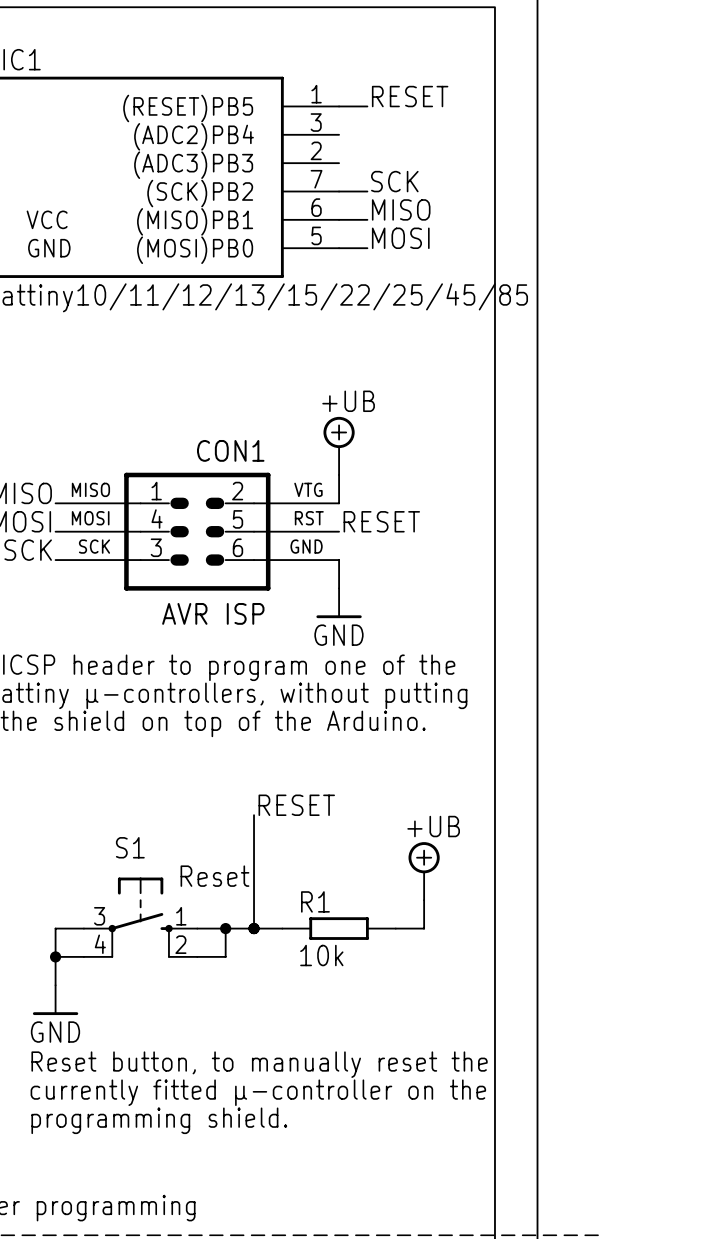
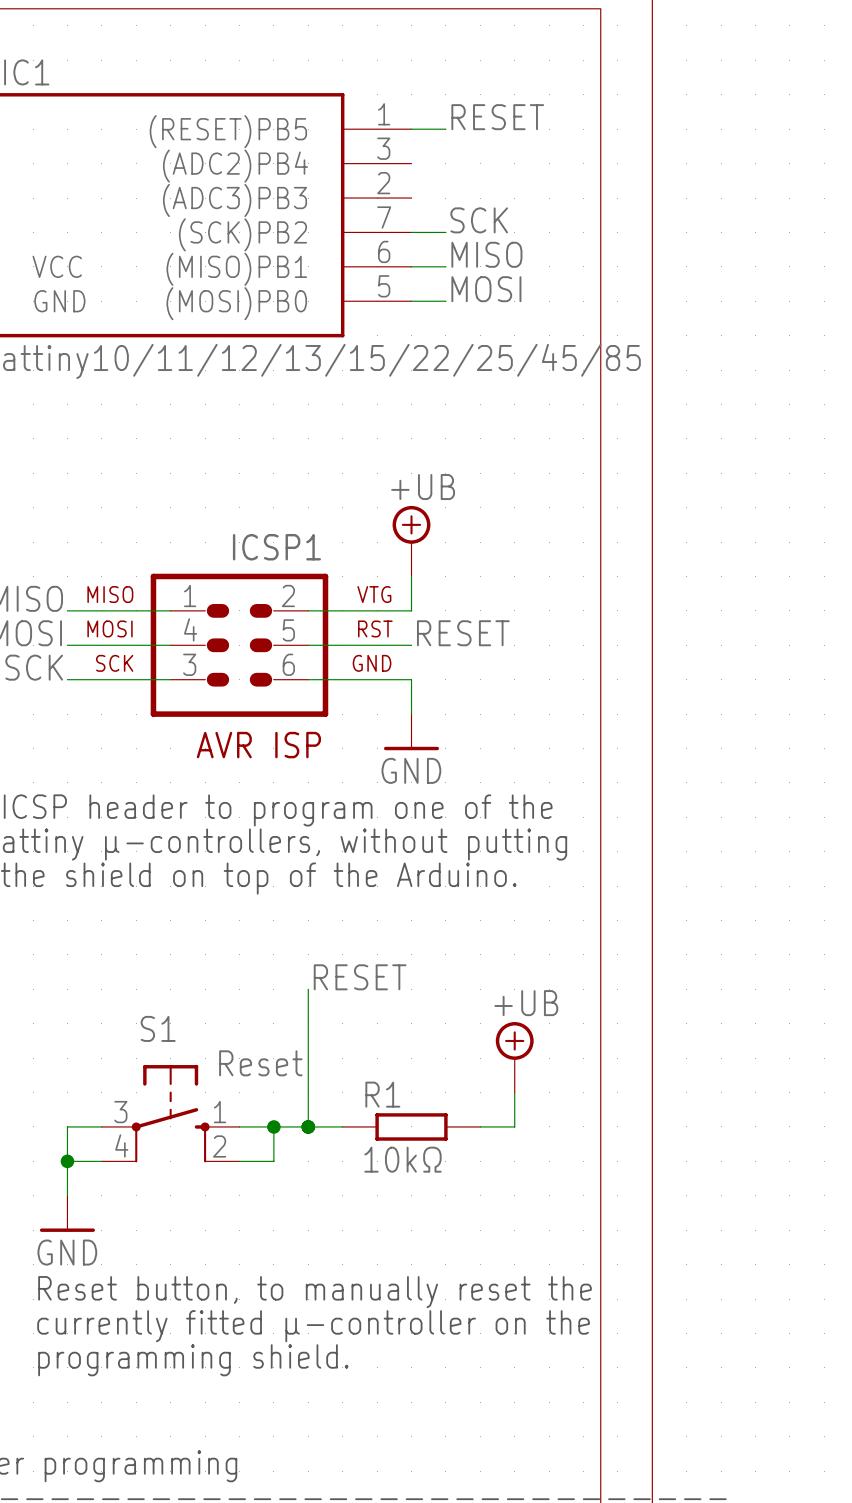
CON1 name: CON1 (230, 450) -> ICSP1 (276, 547)
R1 value: 10k (321, 955) -> 10kΩ (402, 1159)

